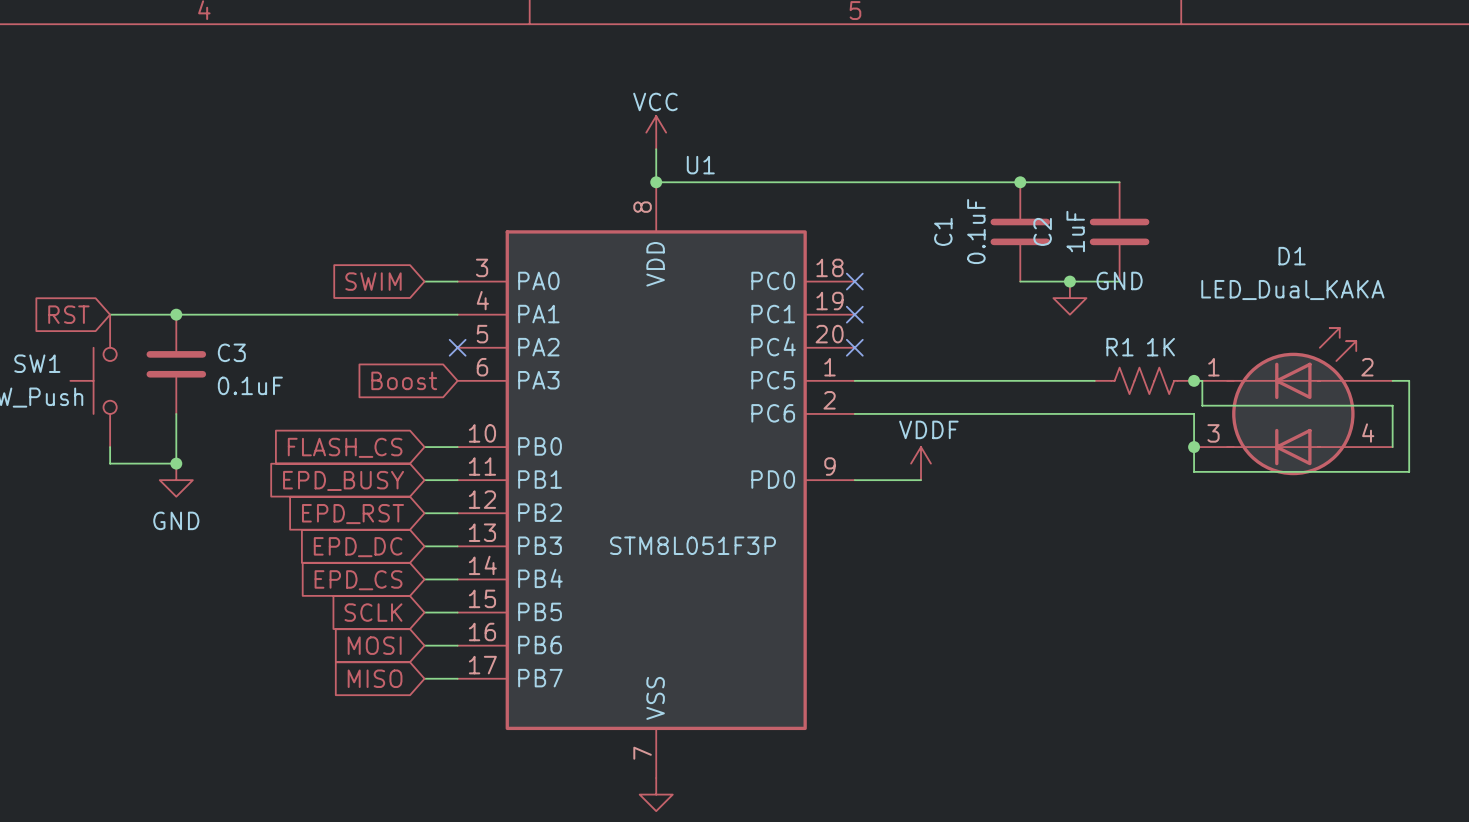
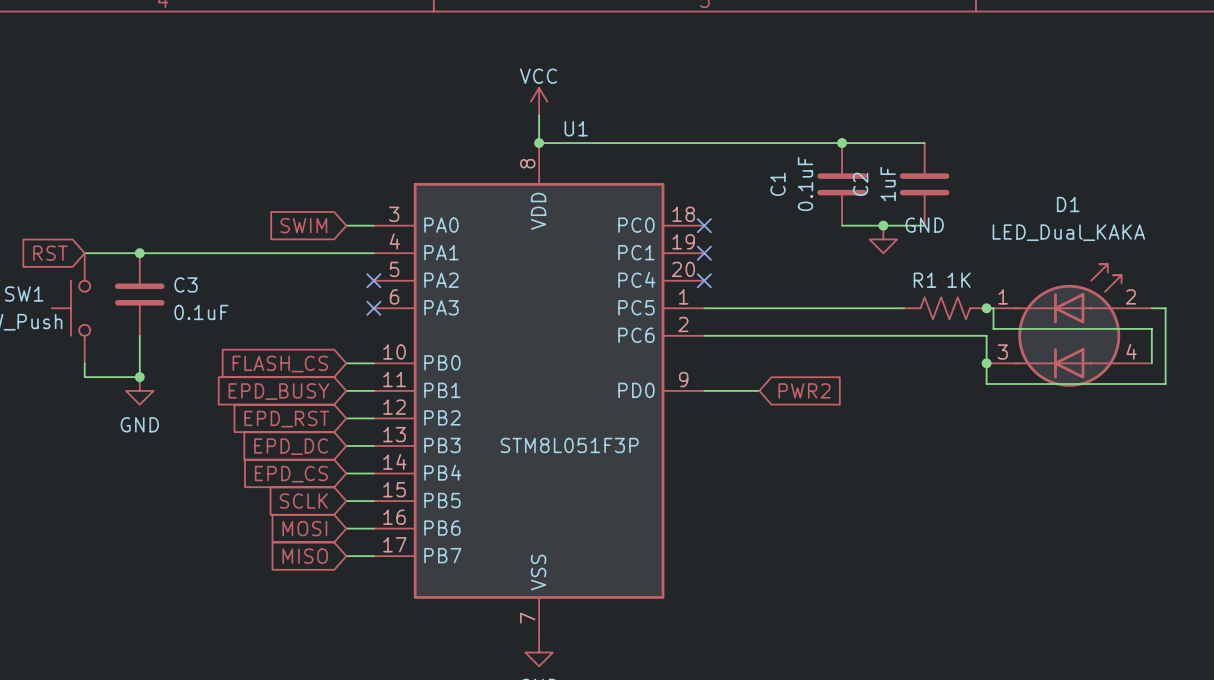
global label: Boost (404, 380) -> none
no-connect mark: none -> (373, 308)
power symbol: VDDF (921, 463) -> none
global label: none -> PWR2 (804, 390)

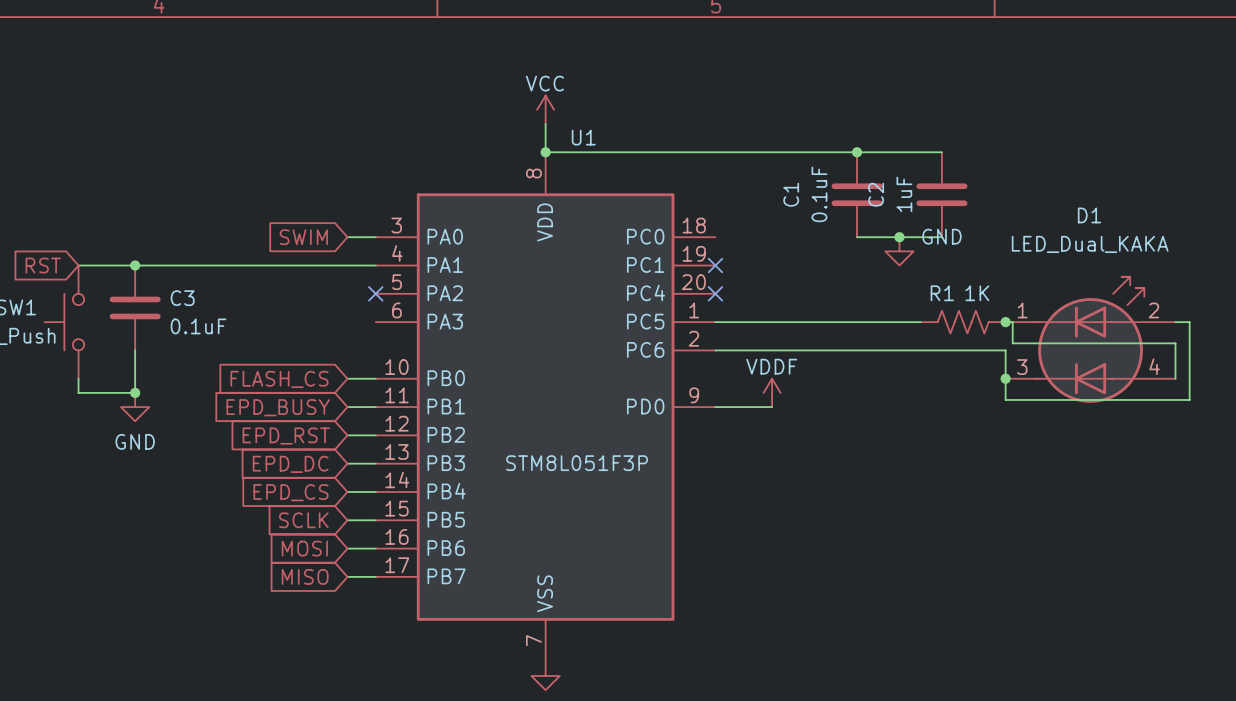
no-connect mark: (704, 225) -> none
no-connect mark: (373, 308) -> none
power symbol: none -> VDDF (772, 392)
global label: PWR2 (804, 390) -> none

